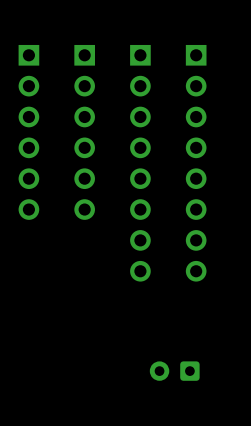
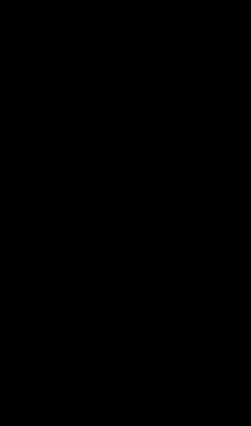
part: (28, 132) -> none
part: (84, 132) -> none
part: (140, 163) -> none
part: (196, 163) -> none
part: (174, 371) -> none

